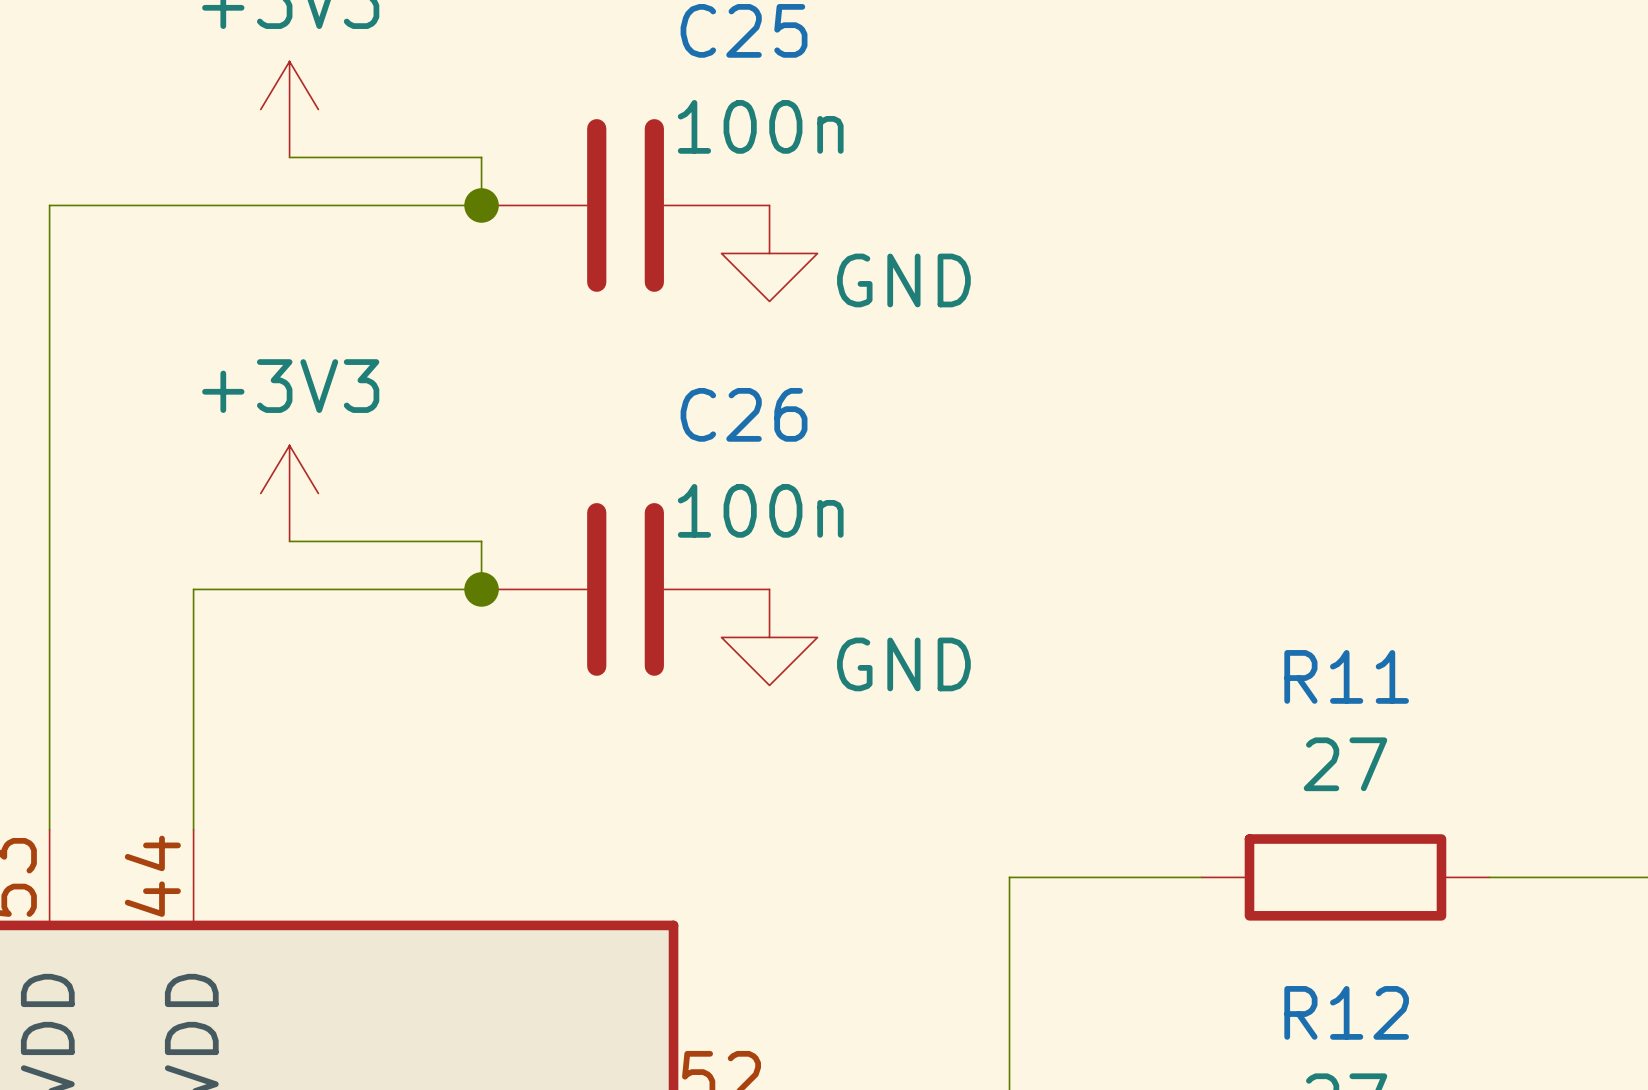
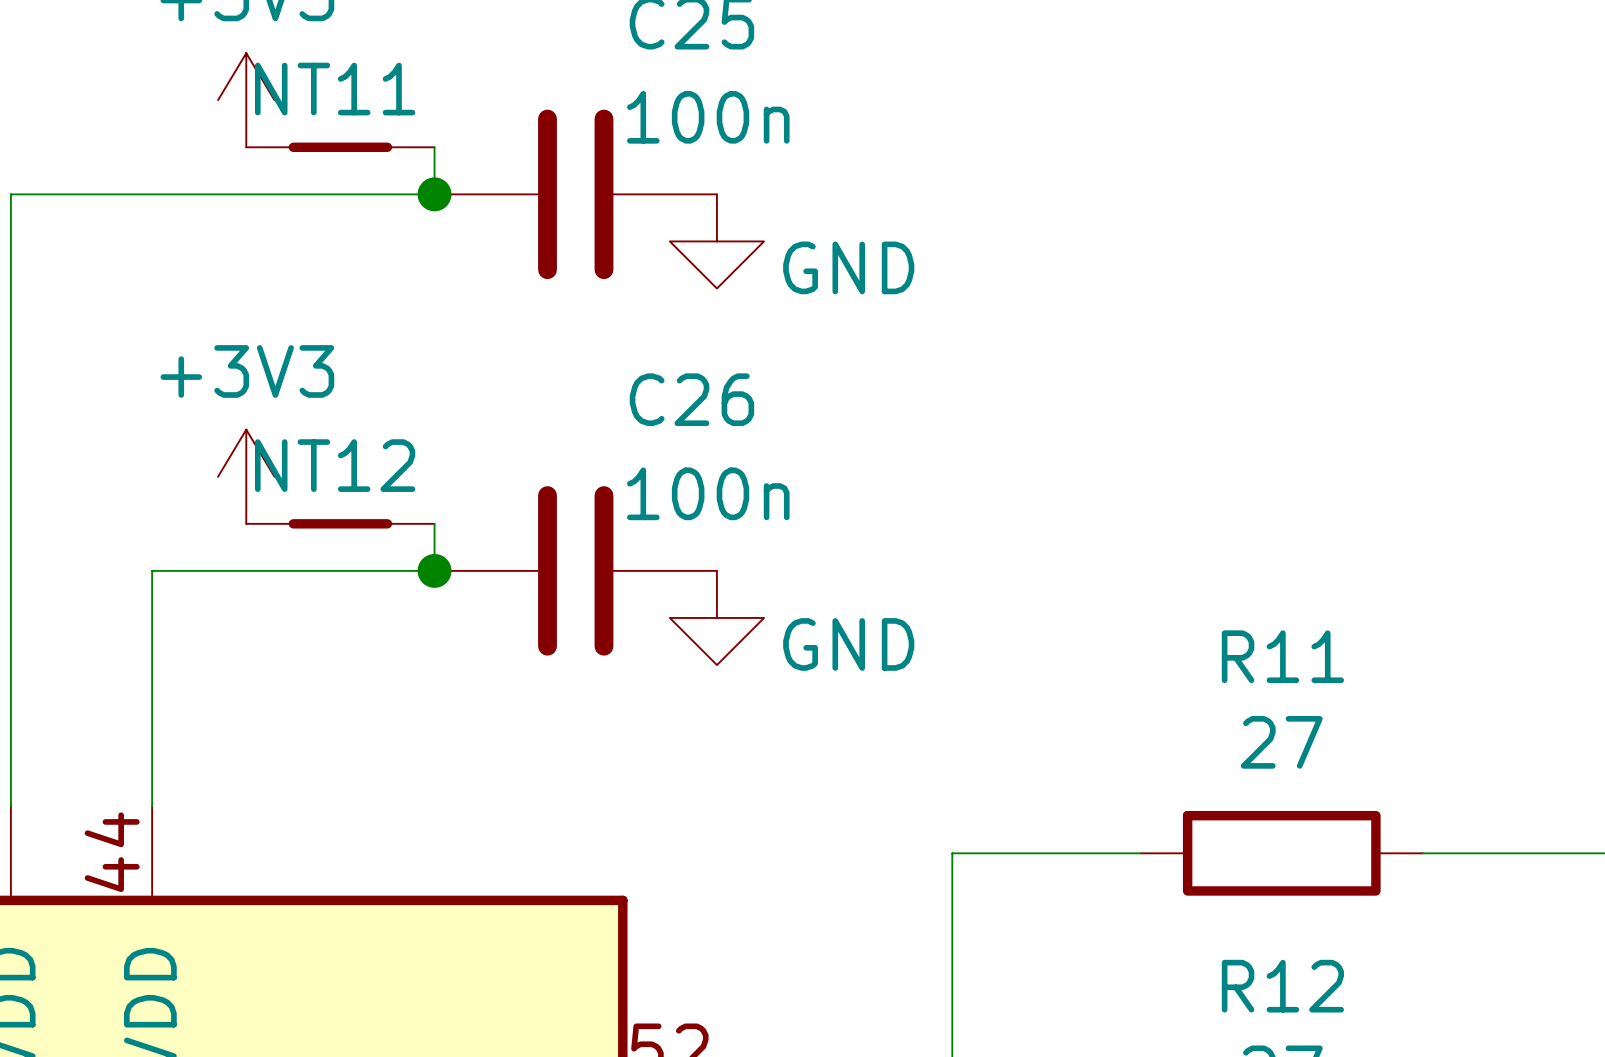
NT11: none -> (340, 147)
NT12: none -> (340, 523)

